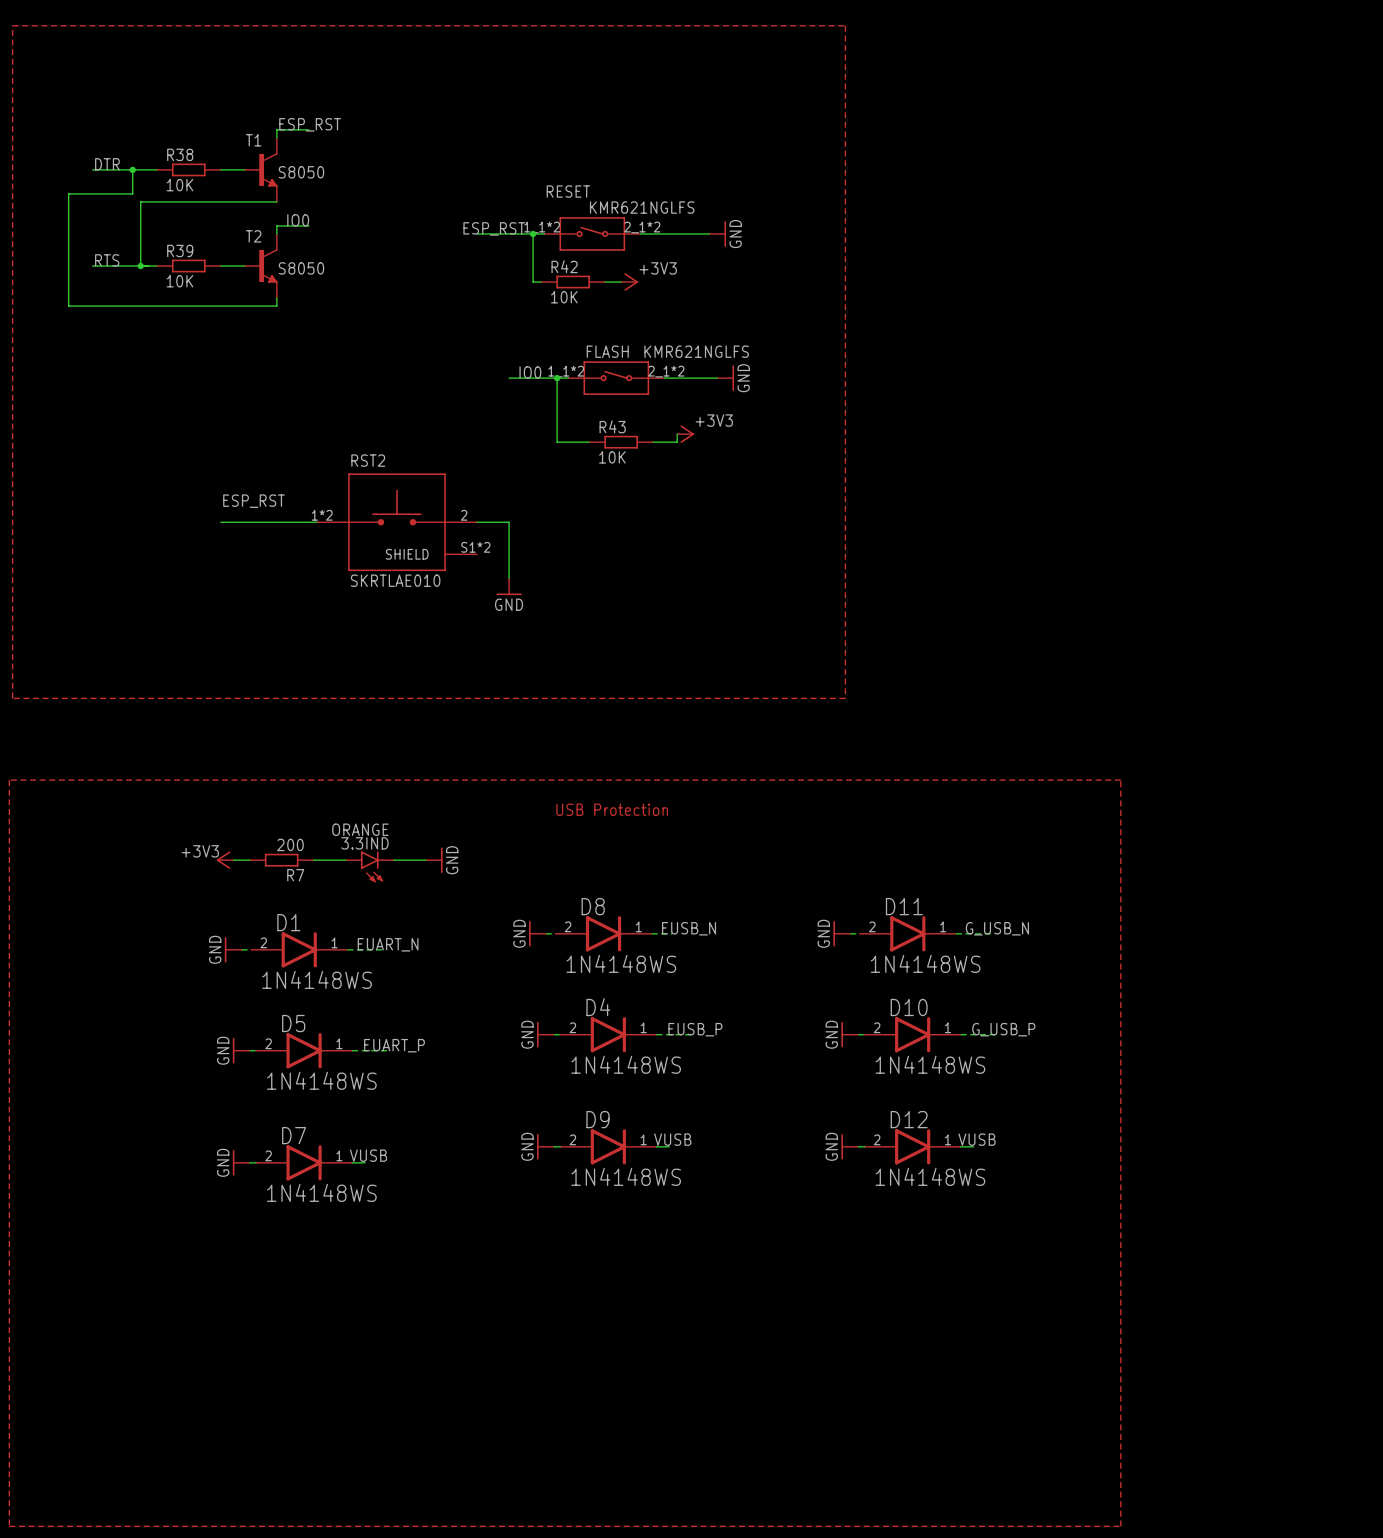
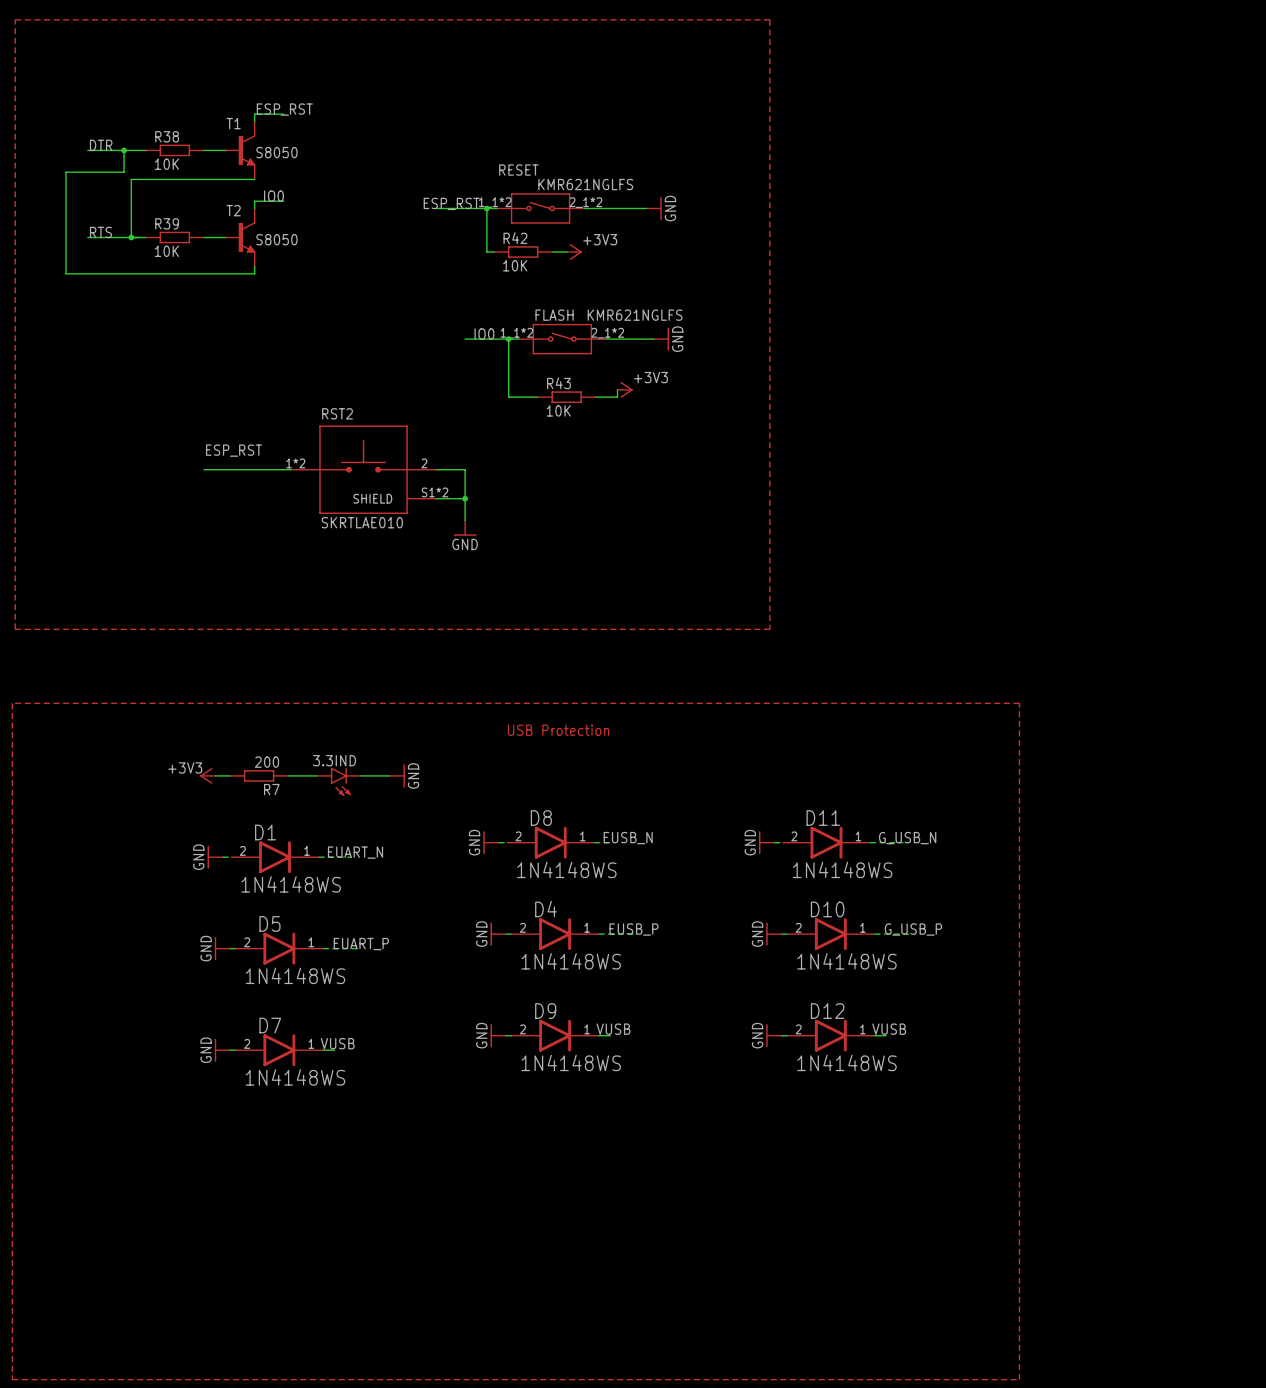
wire: none -> (436, 498) (465, 498)
junction: none -> (465, 498)
3.3IND value: ORANGE (360, 829) -> none

